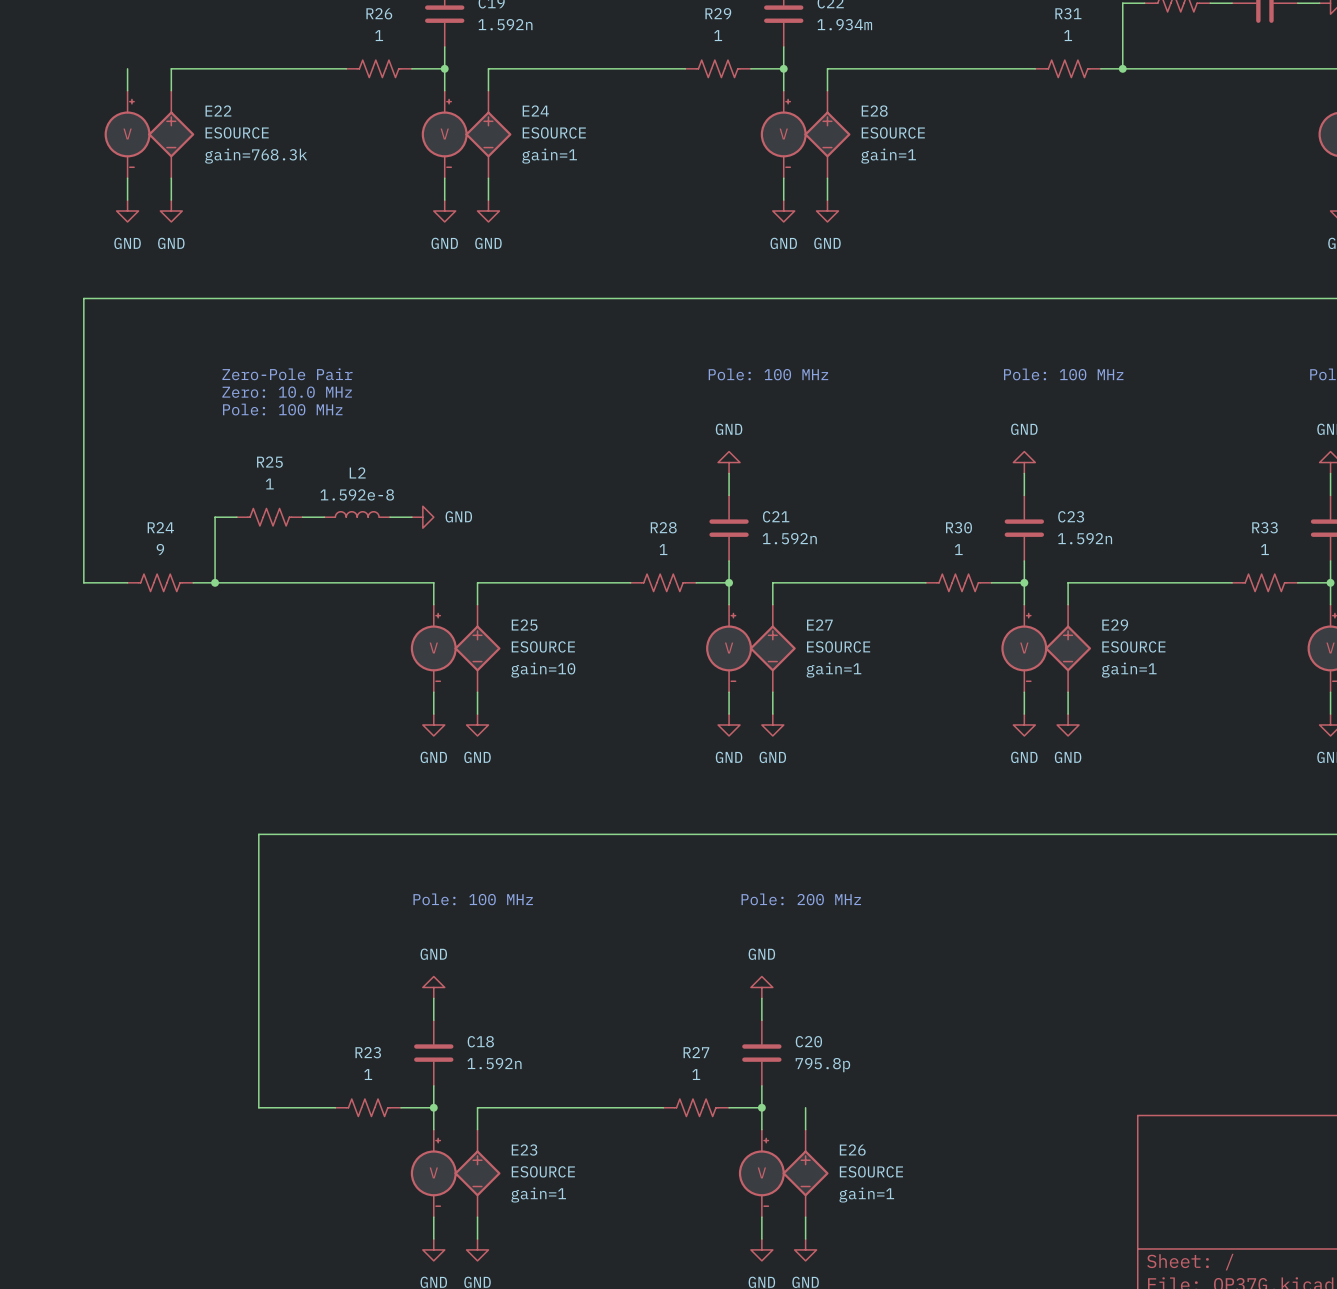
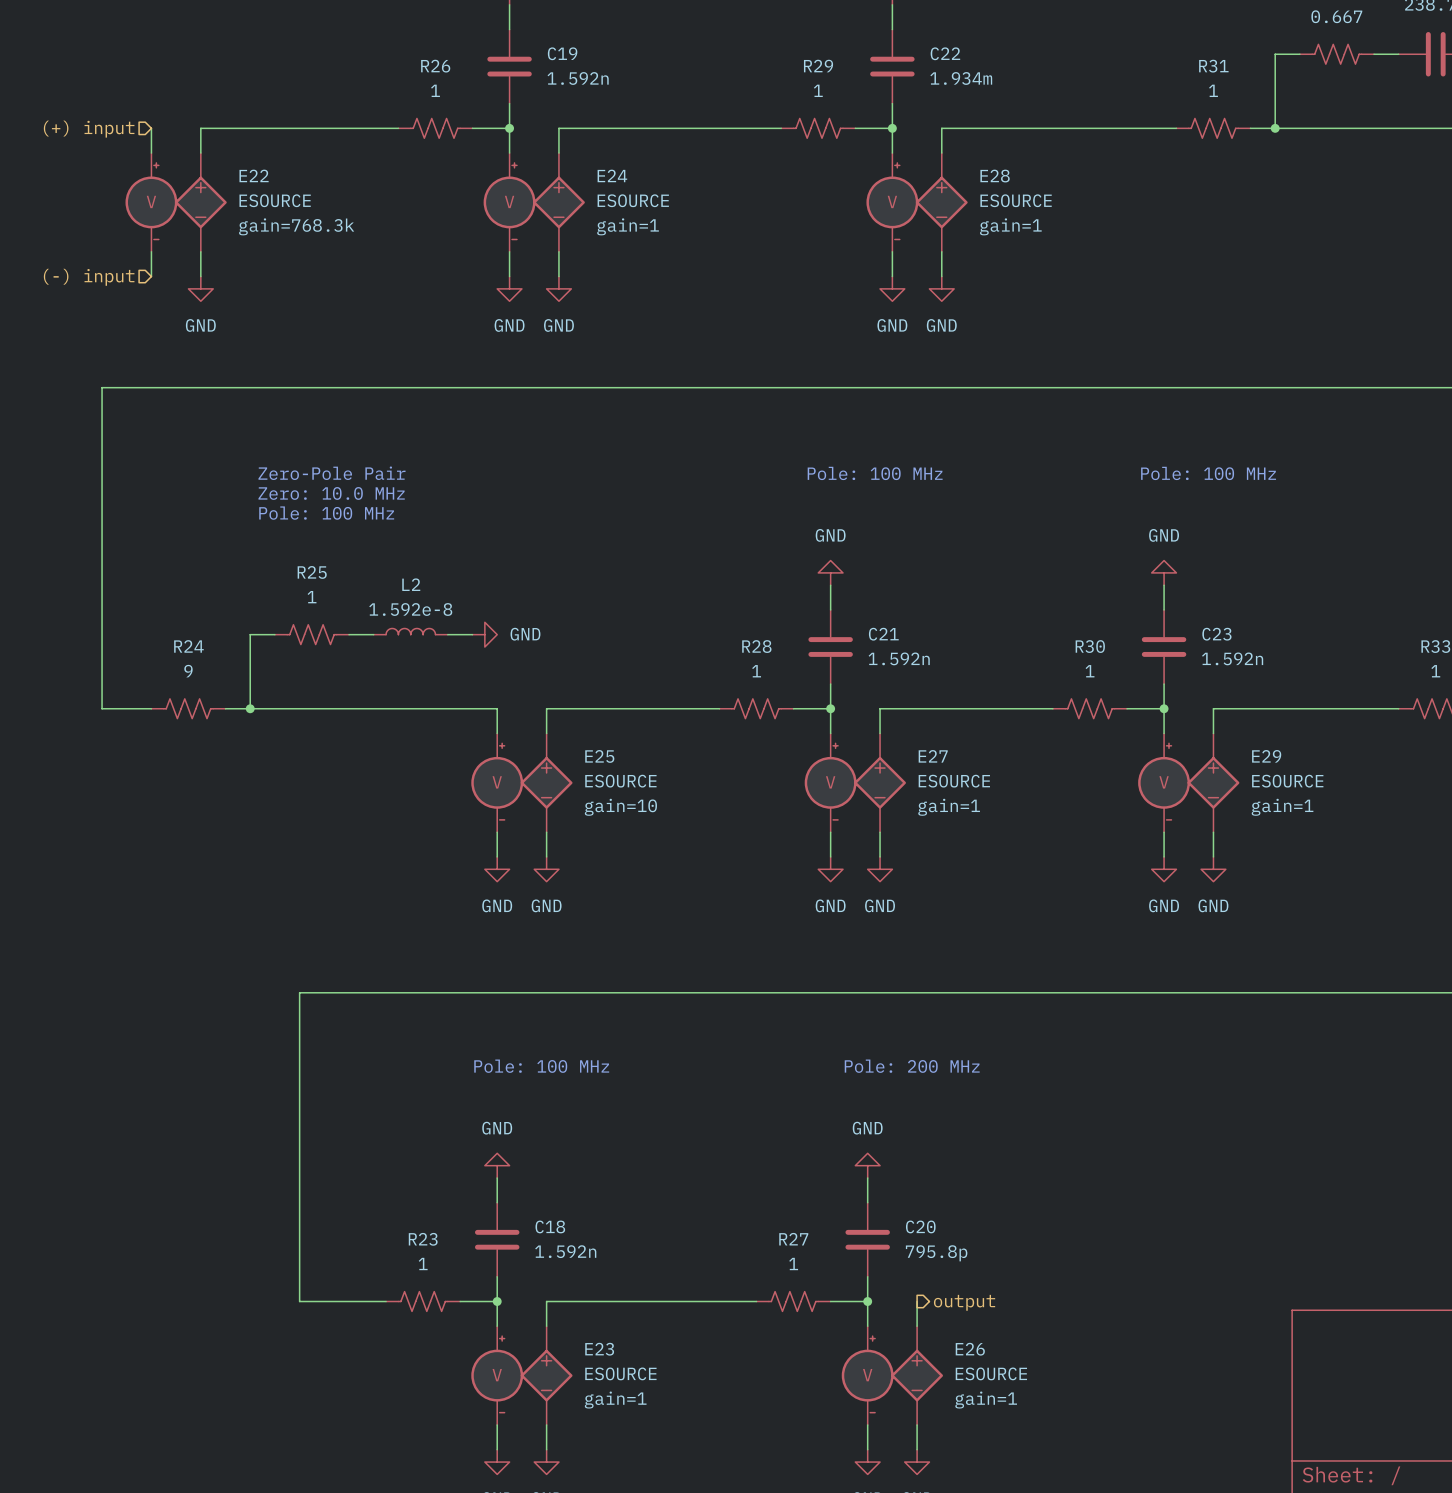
hierarchical label: none -> (+) input (89, 129)
hierarchical label: none -> (-) input (89, 277)
power symbol: GND (127, 211) -> none
hierarchical label: none -> output (964, 1302)

